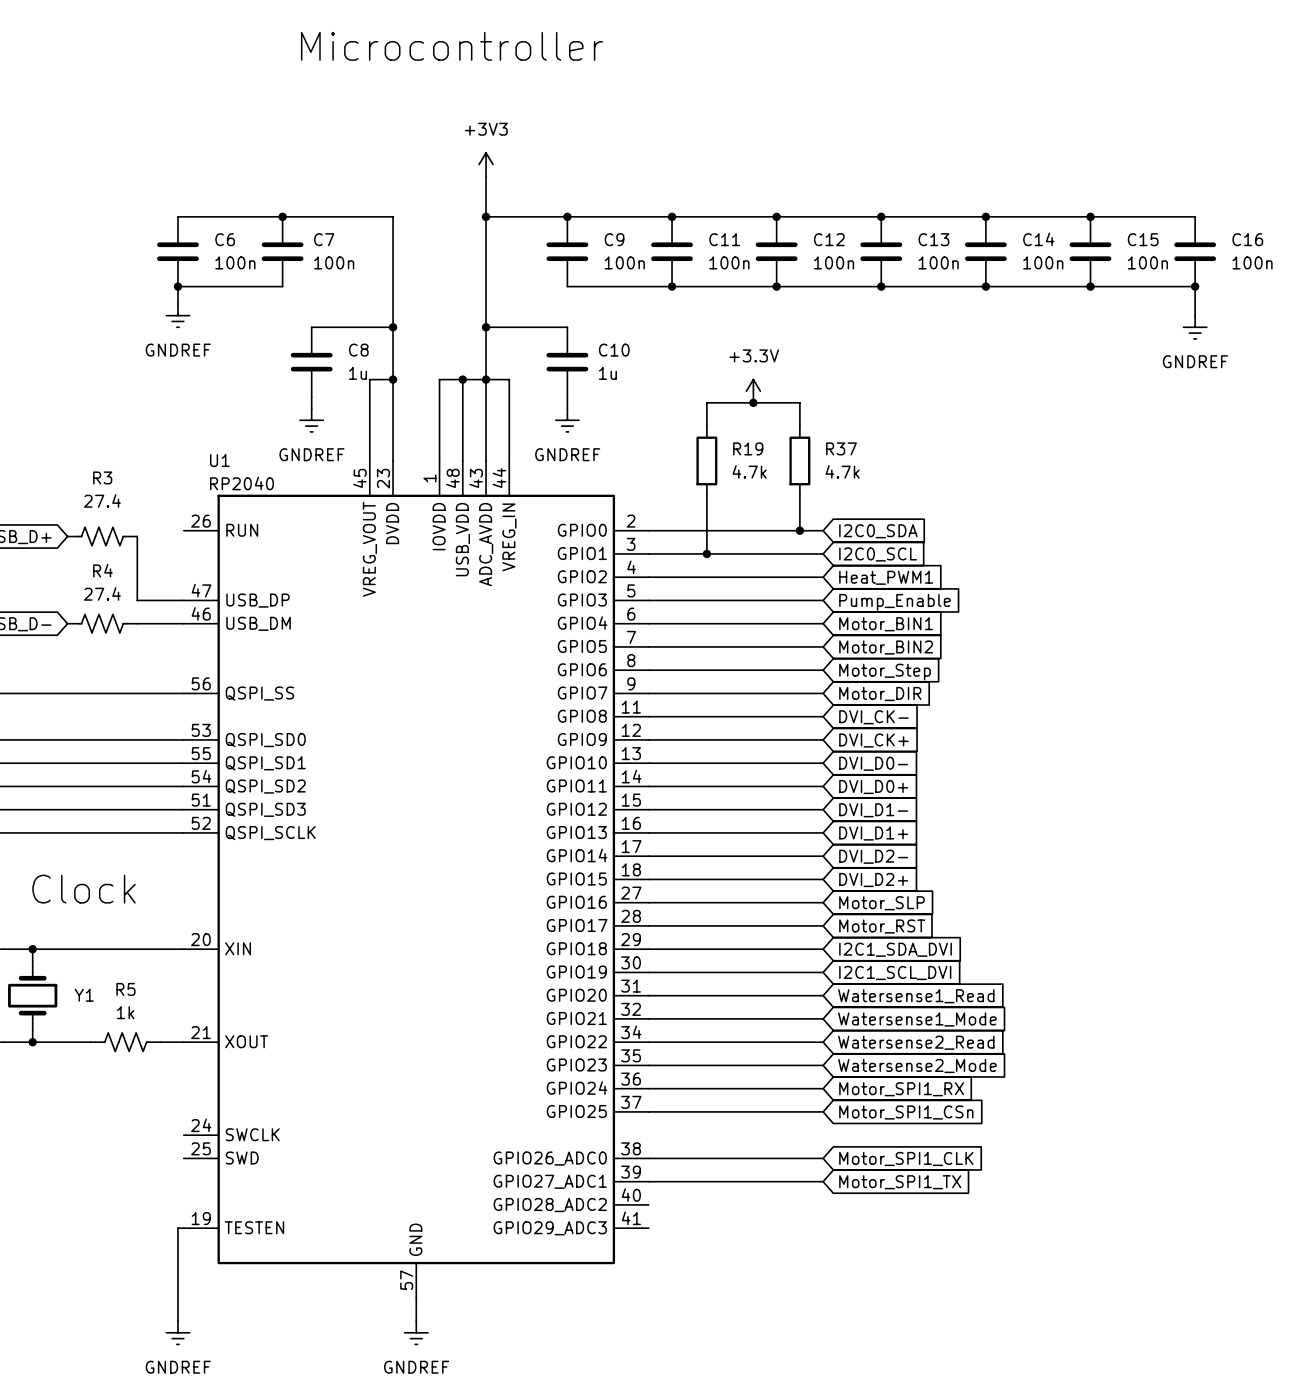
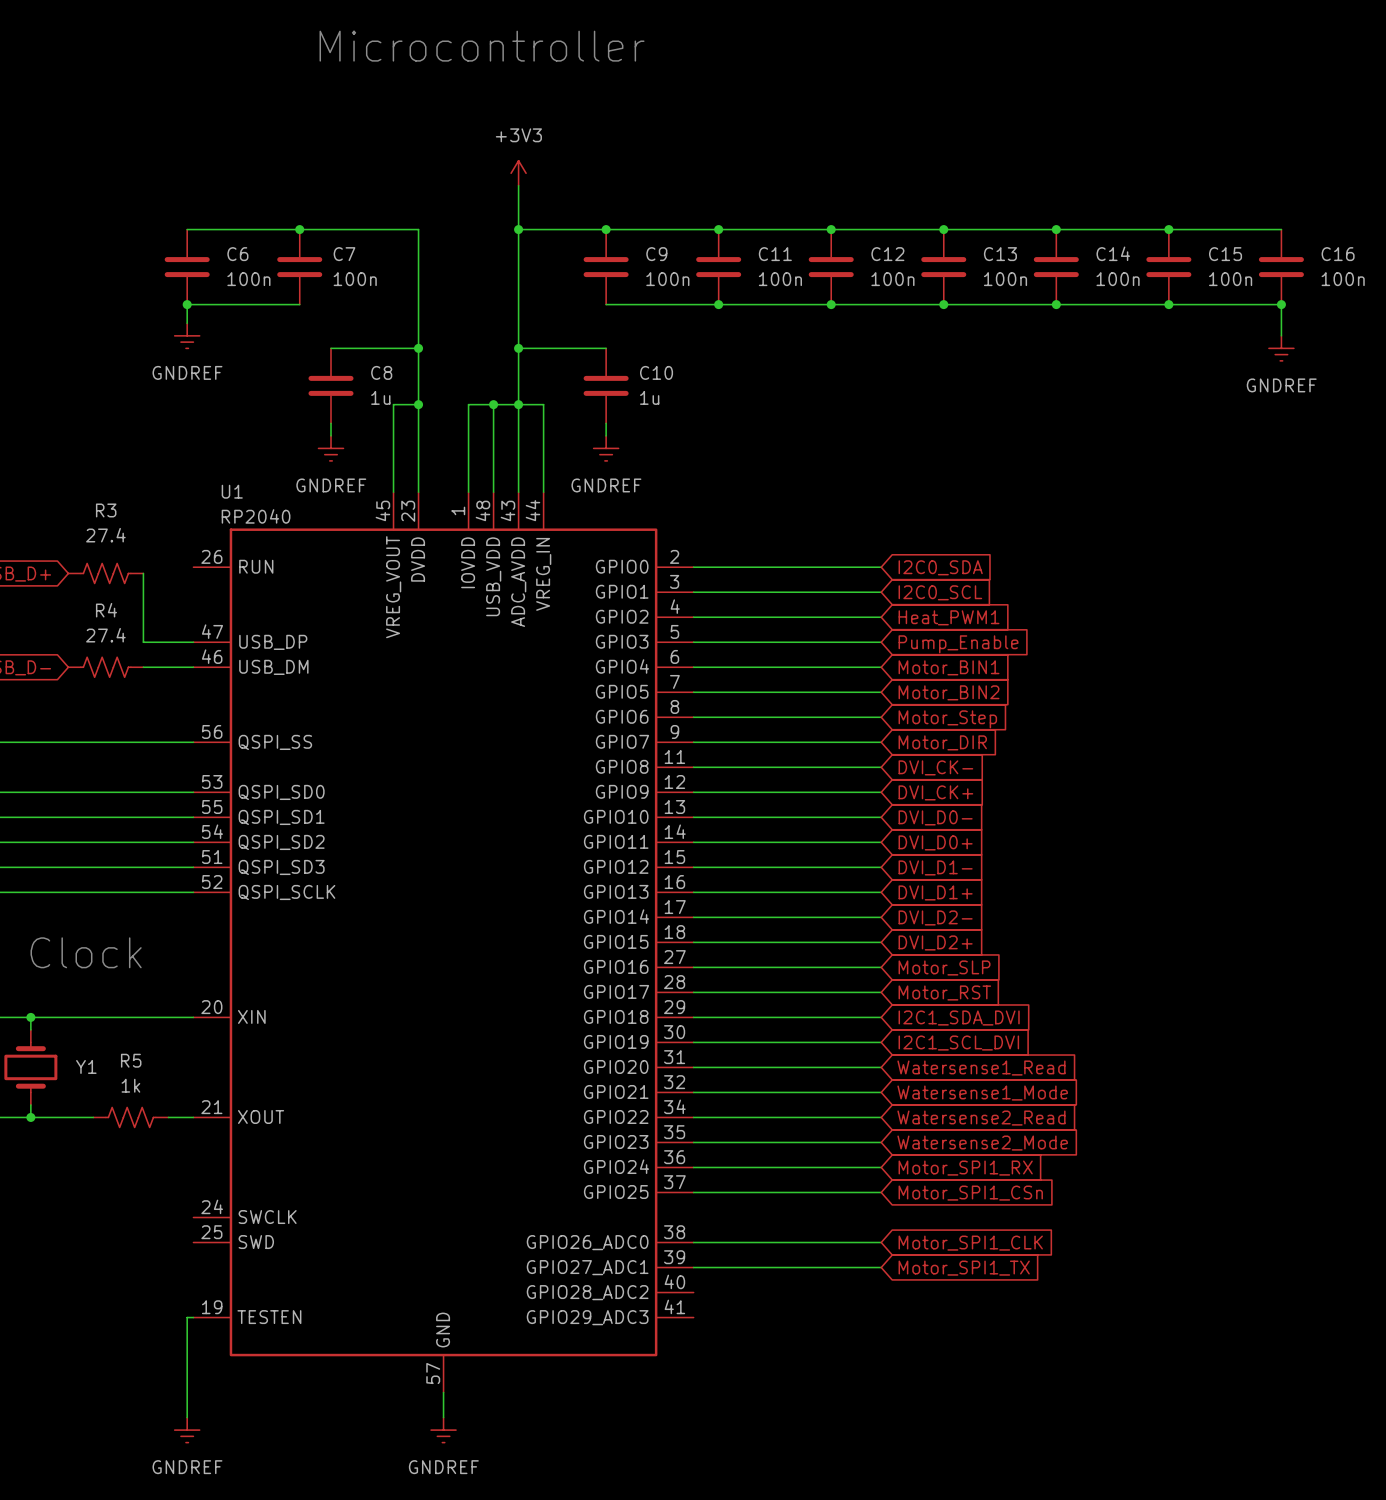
power symbol: +3.3V (753, 391) -> none
junction: (753, 402) -> none
wire: (706, 426) (706, 402) (799, 402) (799, 426) -> none
R19: 4.7k (706, 460) -> none
R37: 4.7k (799, 460) -> none
wire: (706, 495) (706, 553) -> none
wire: (799, 495) (799, 530) -> none
junction: (799, 530) -> none
junction: (706, 553) -> none

